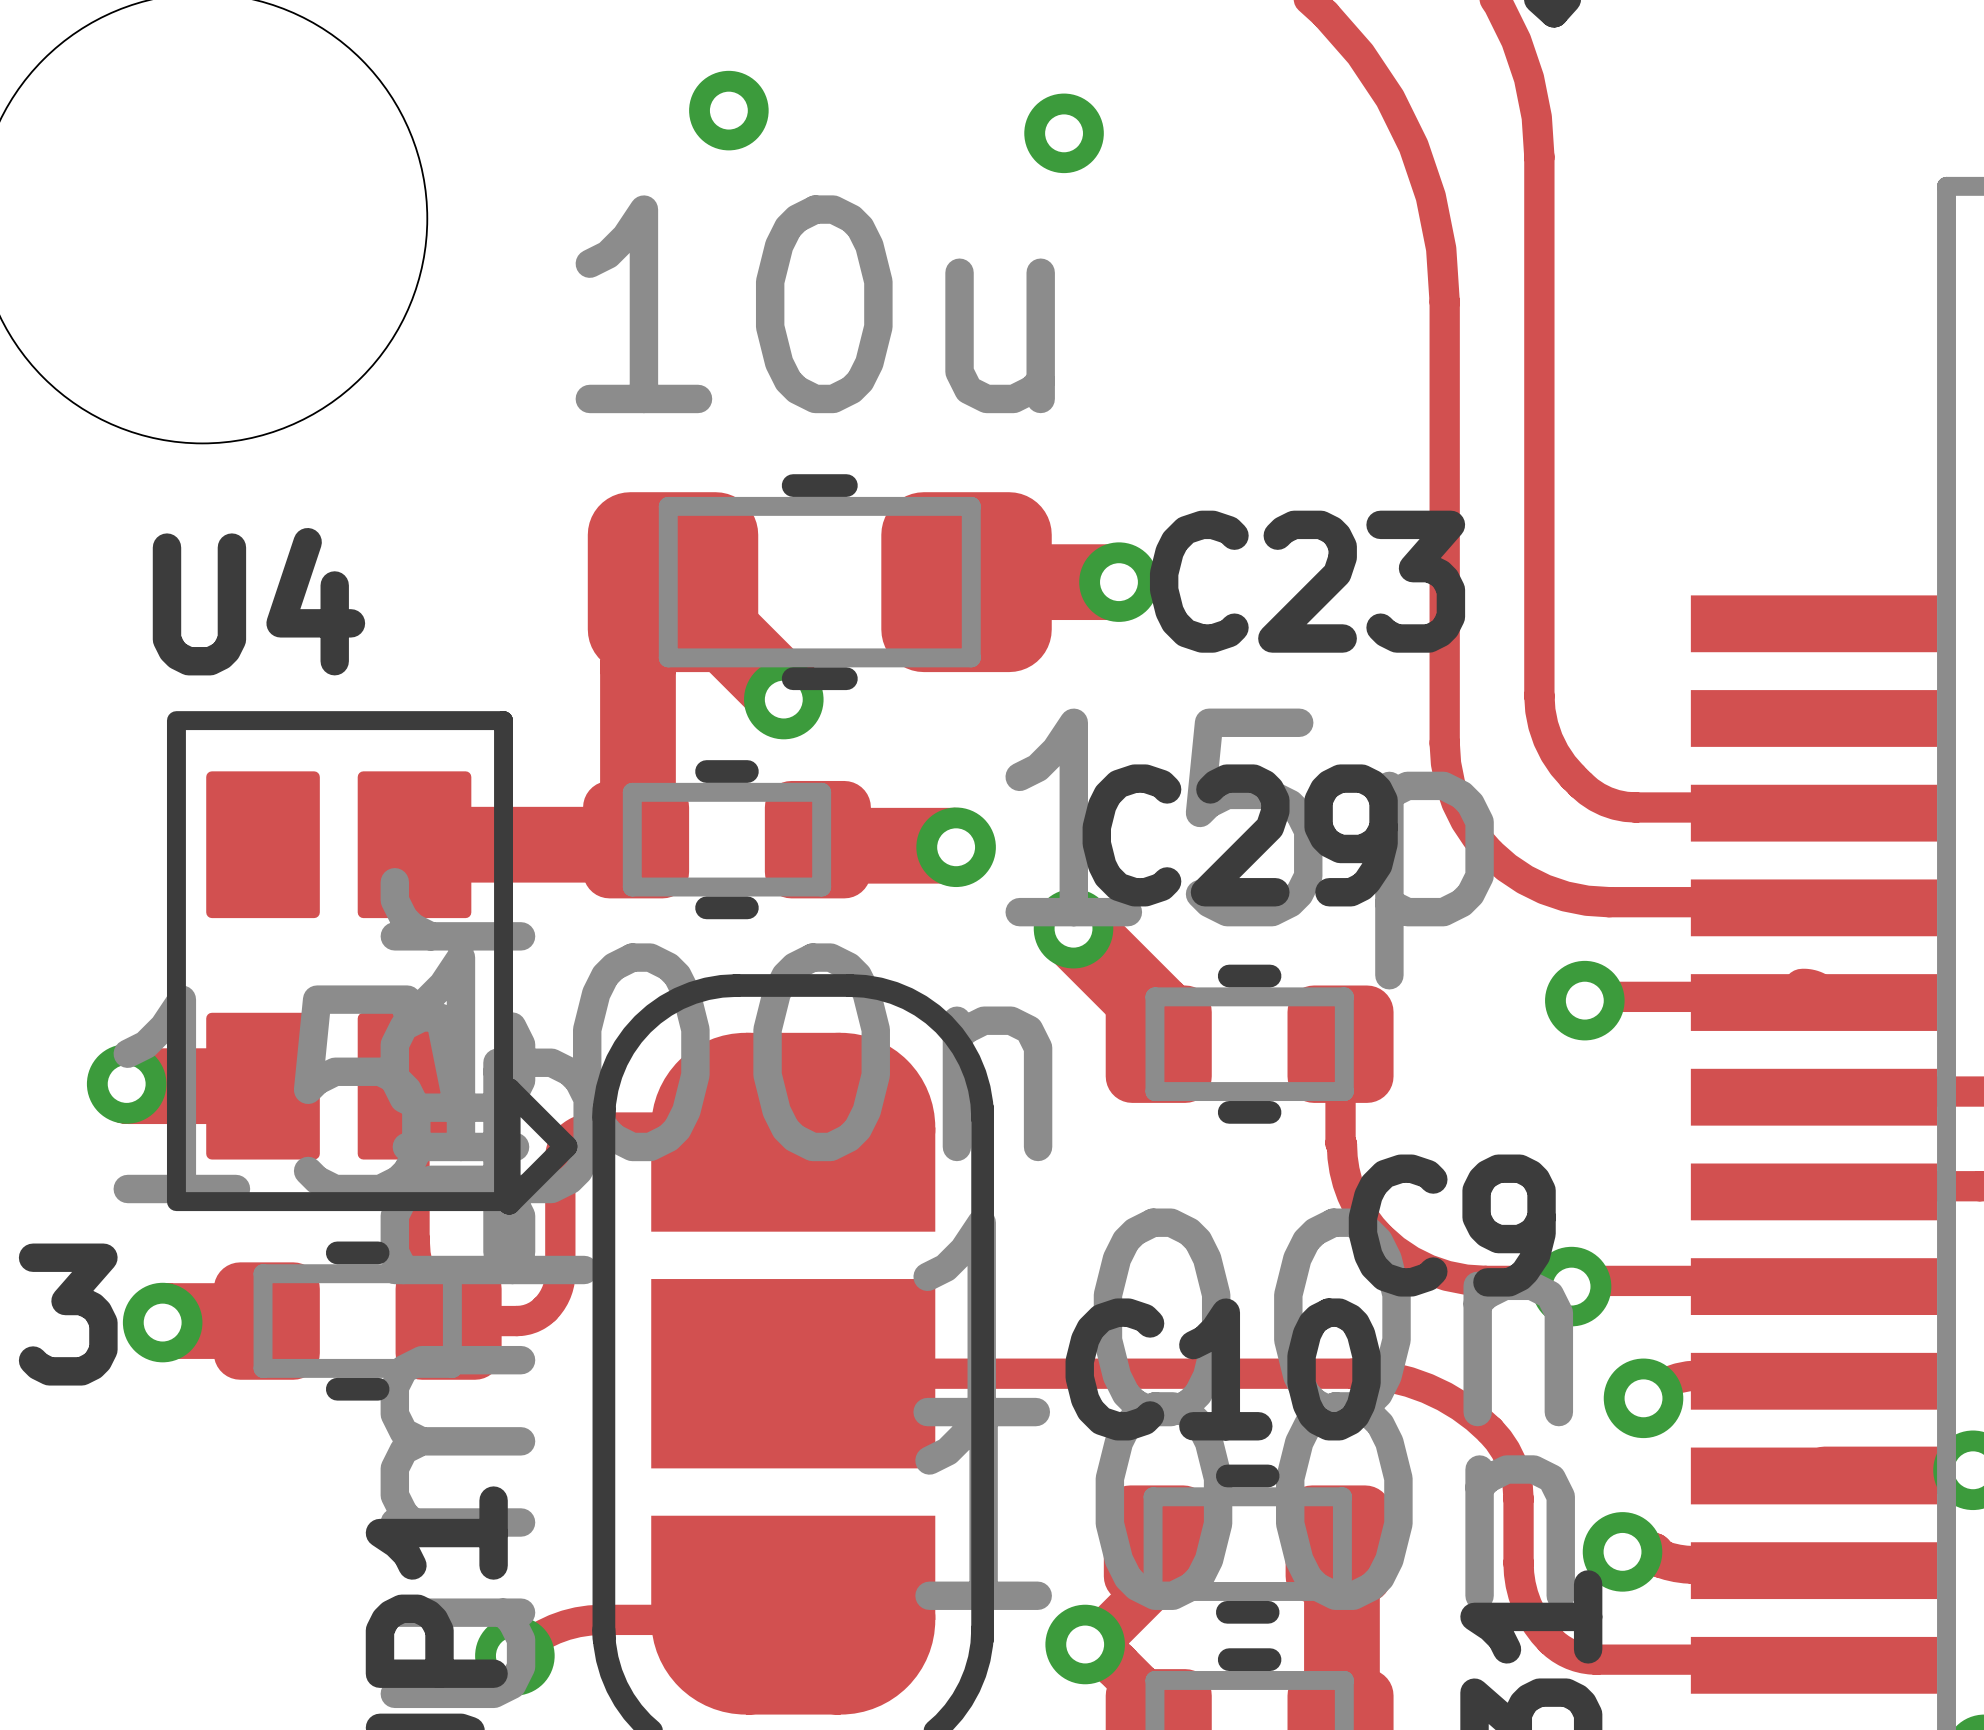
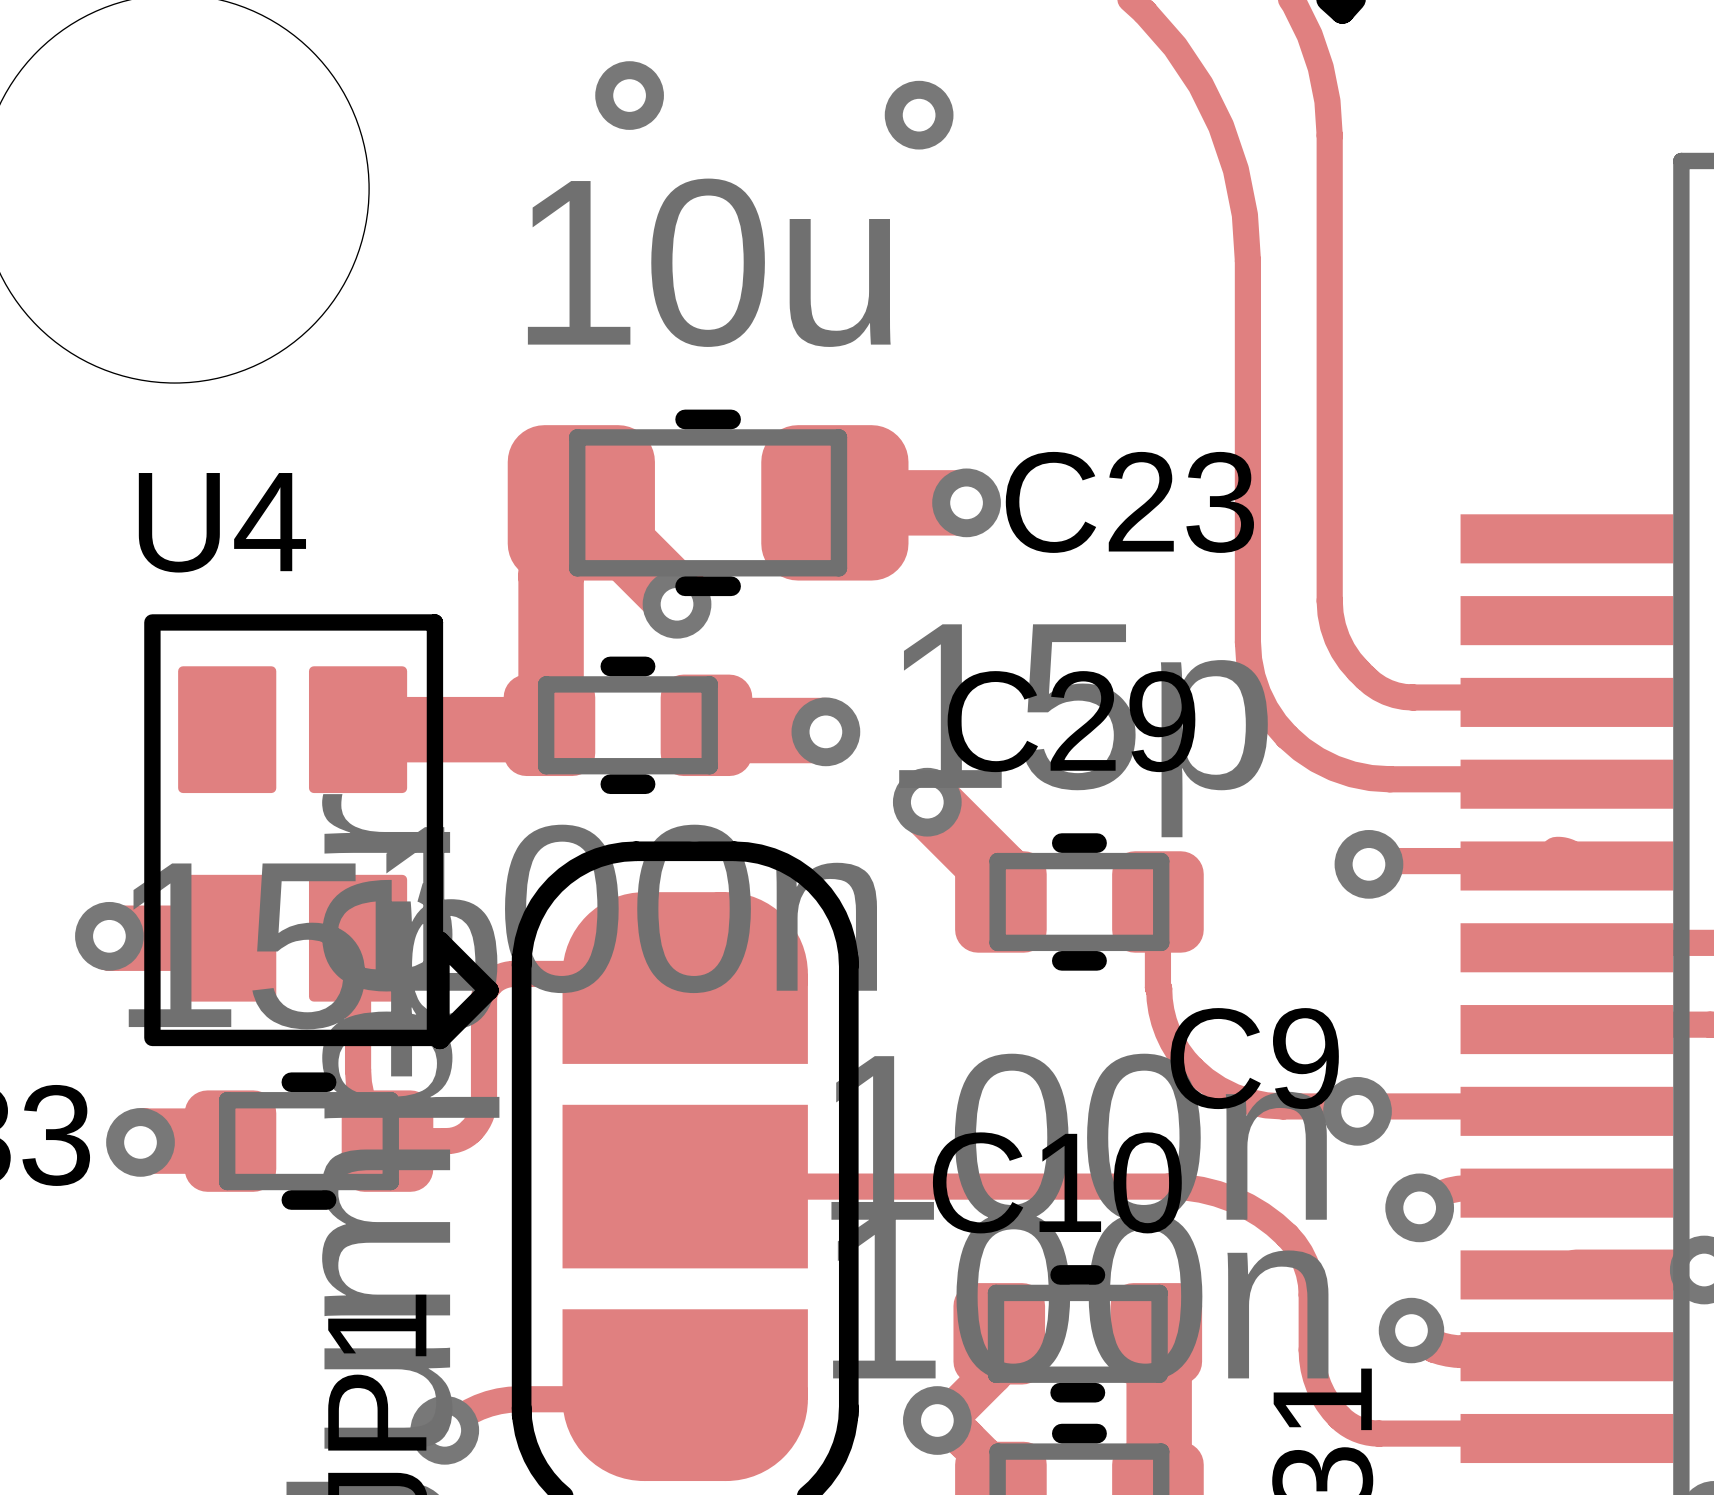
via position: (1622, 1551) -> (1411, 1330)

